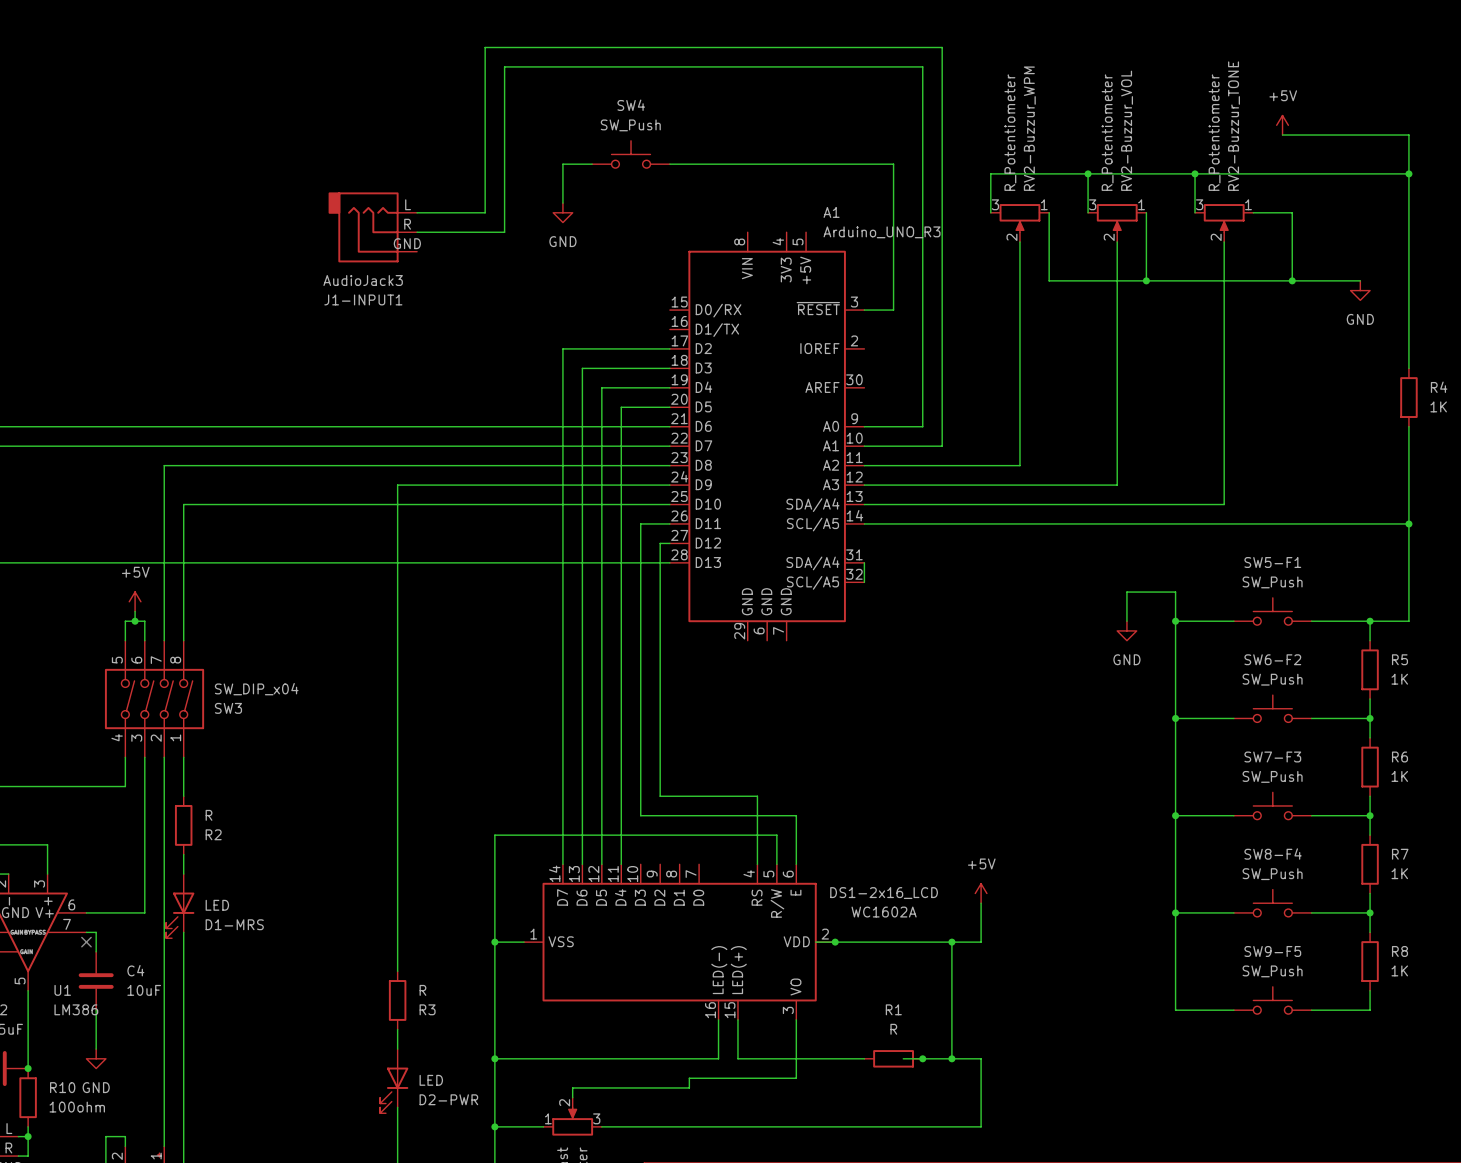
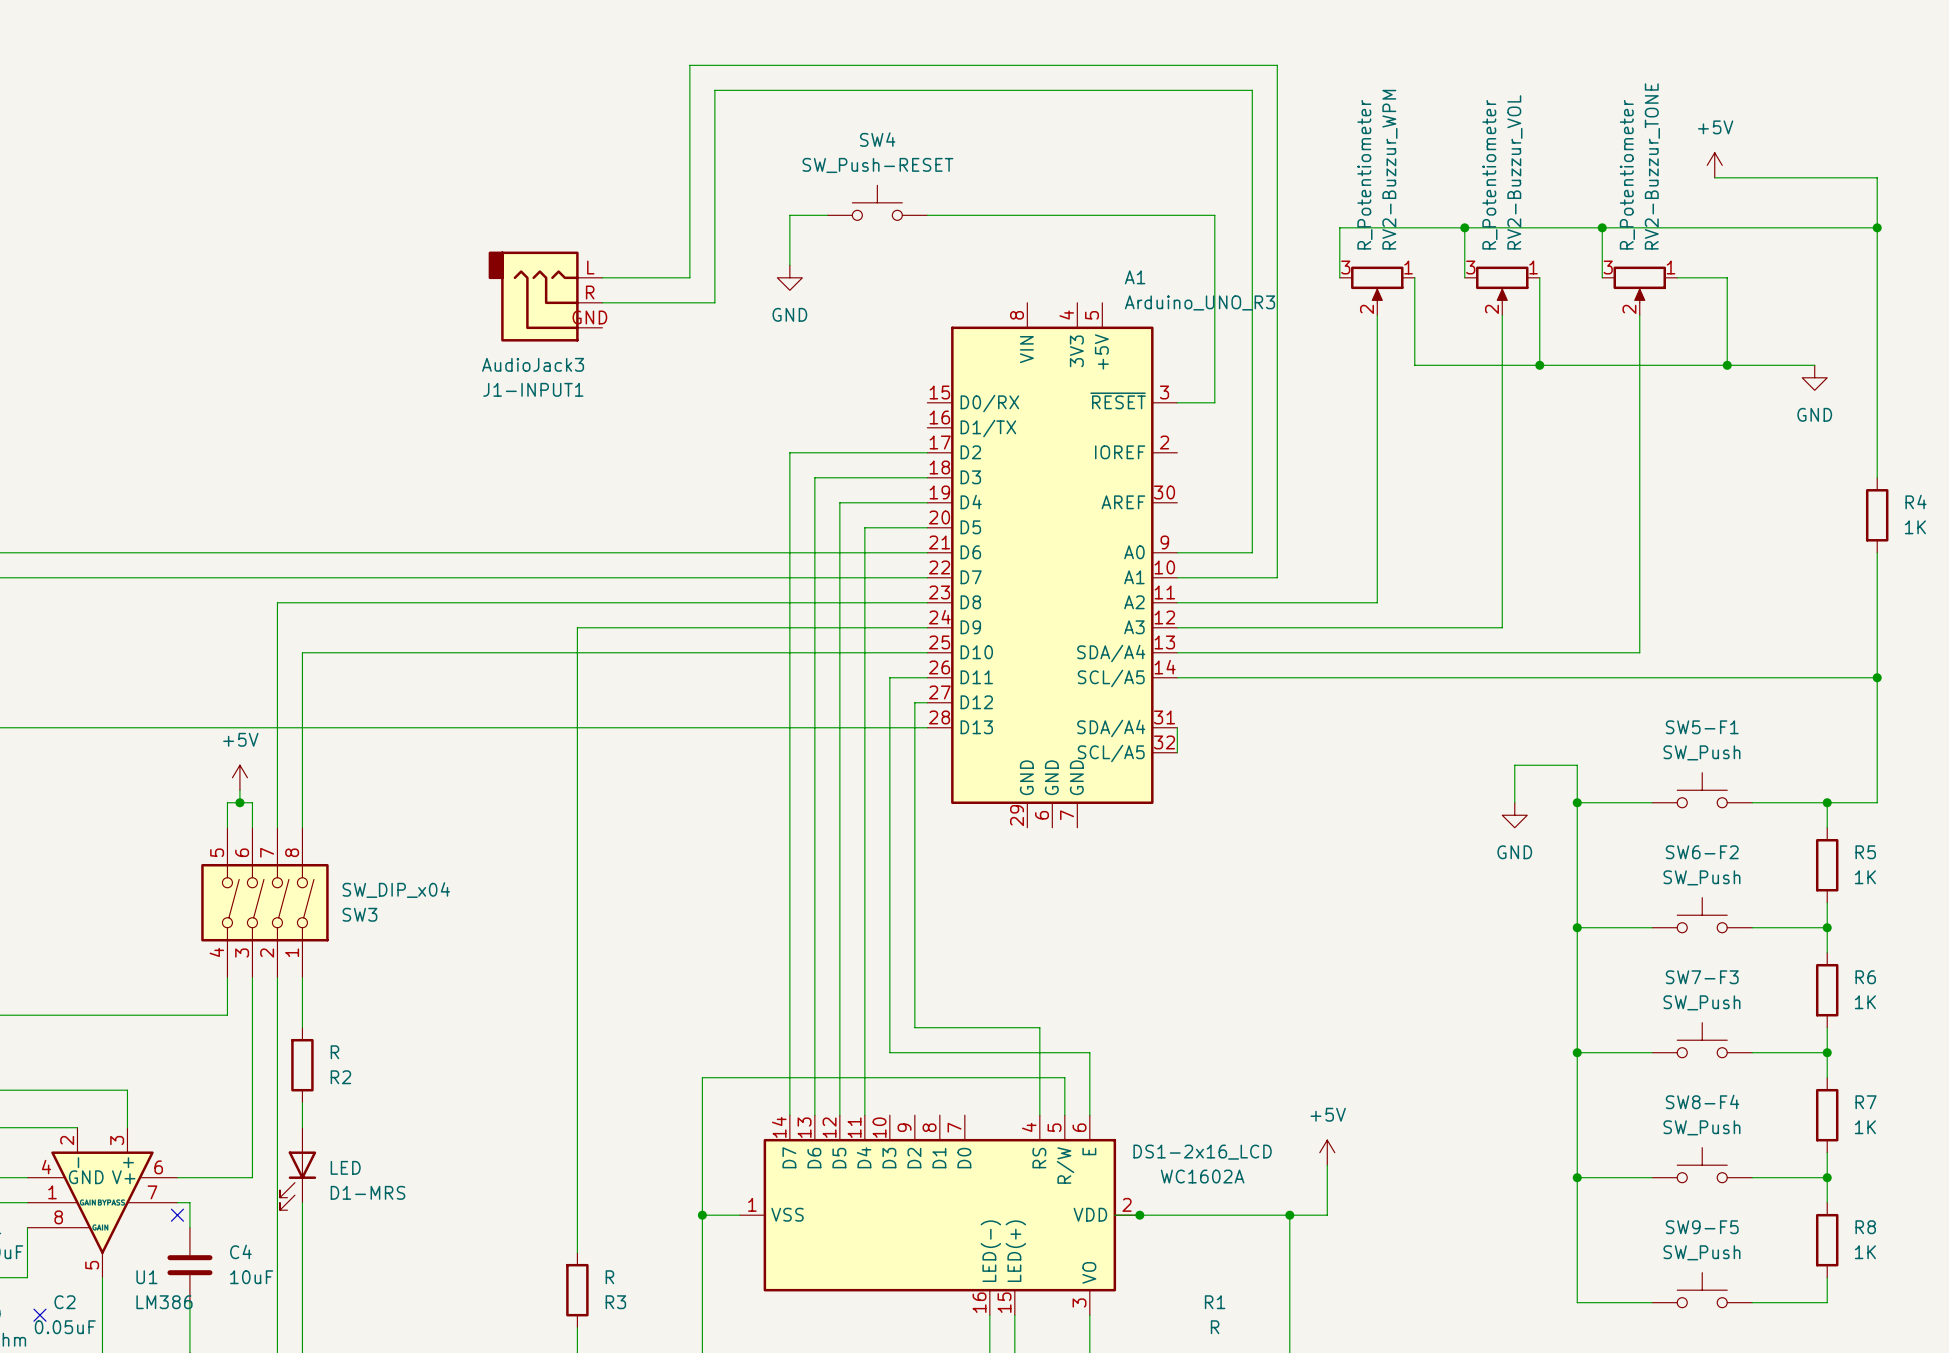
SW4 value: SW_Push (630, 125) -> SW_Push-RESET (877, 165)

